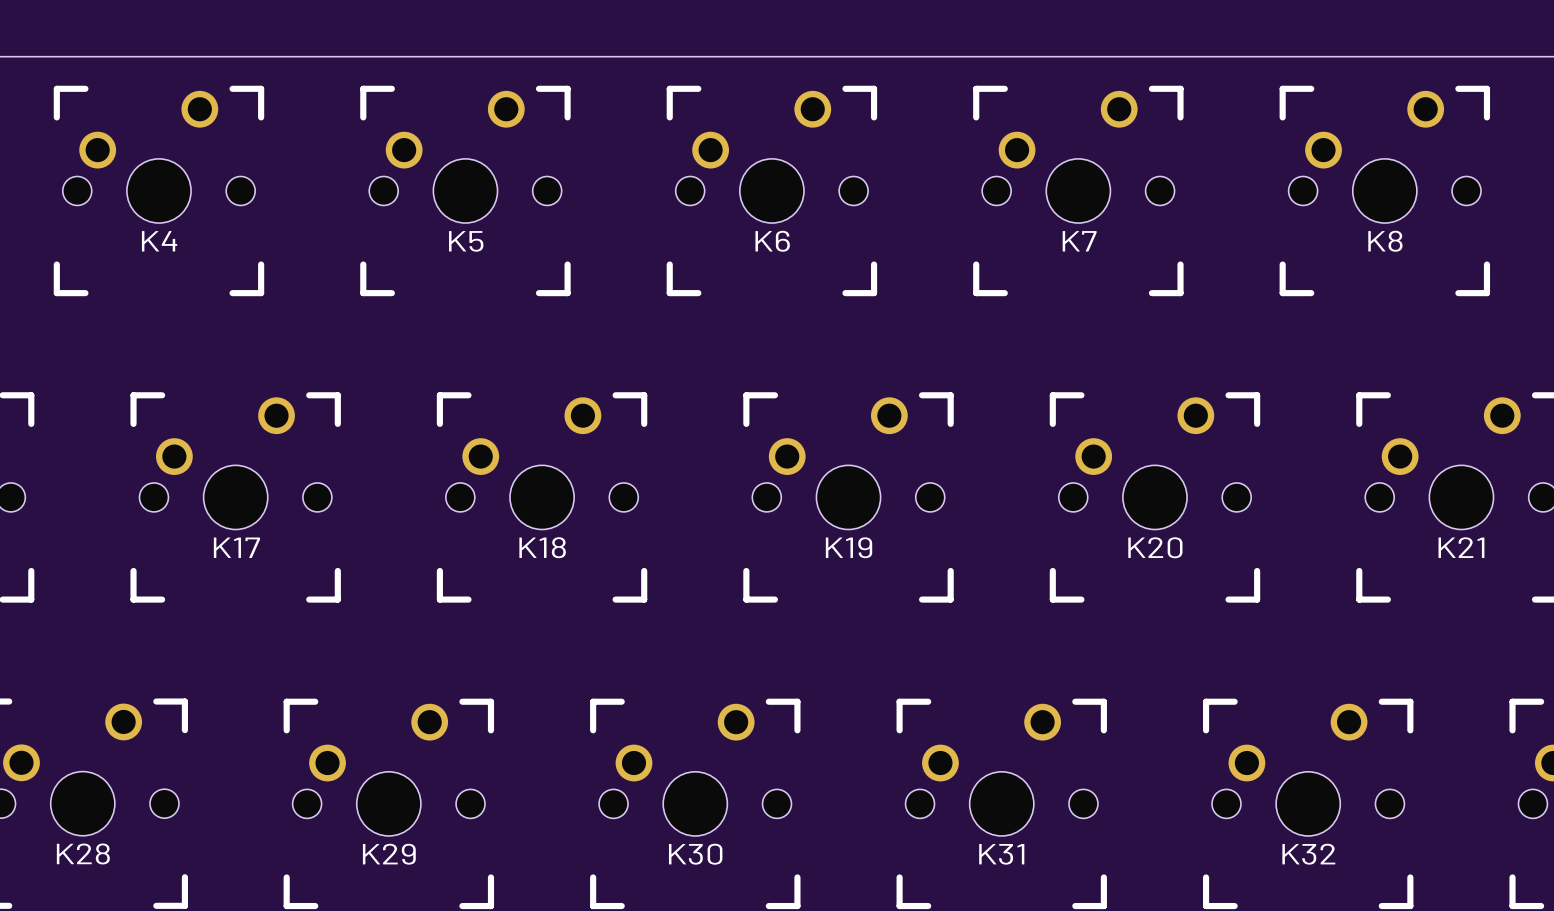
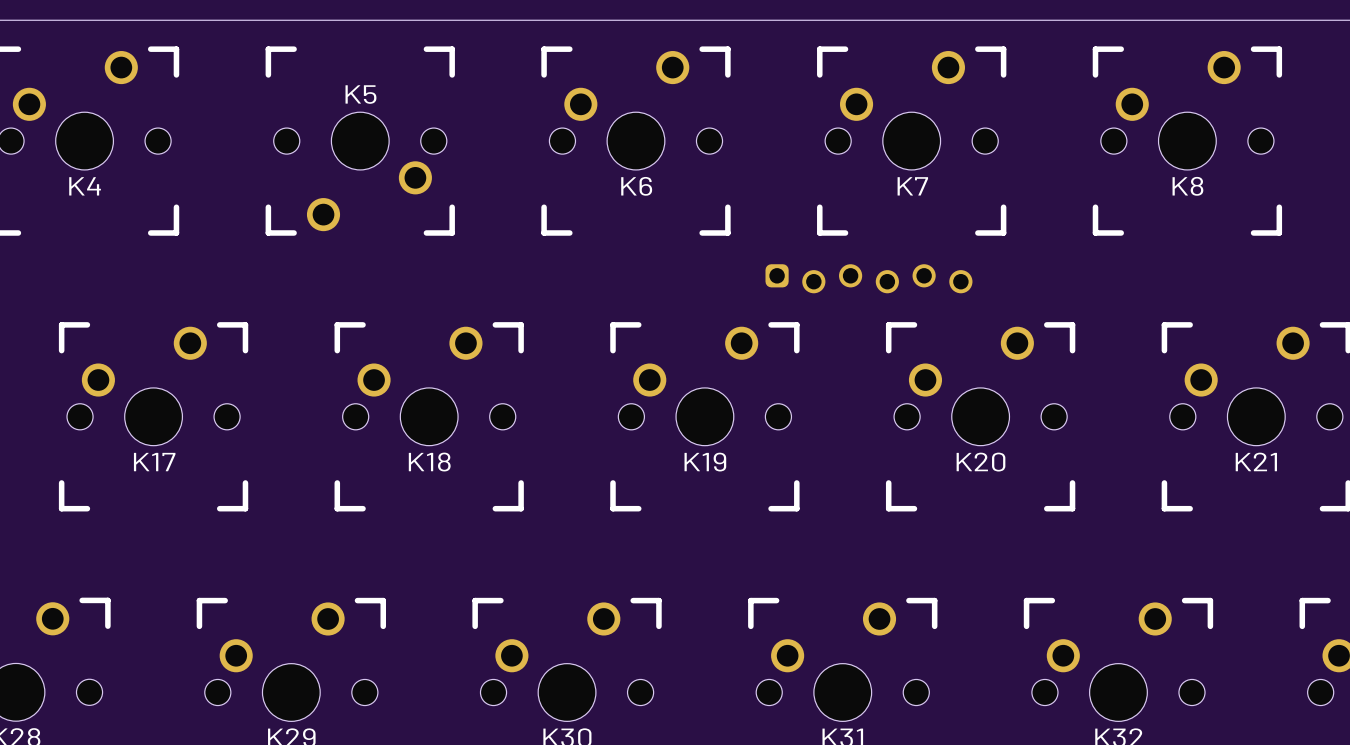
K5 rotation: 0° (465, 190) -> 180° (360, 141)
part: none -> (868, 278)

